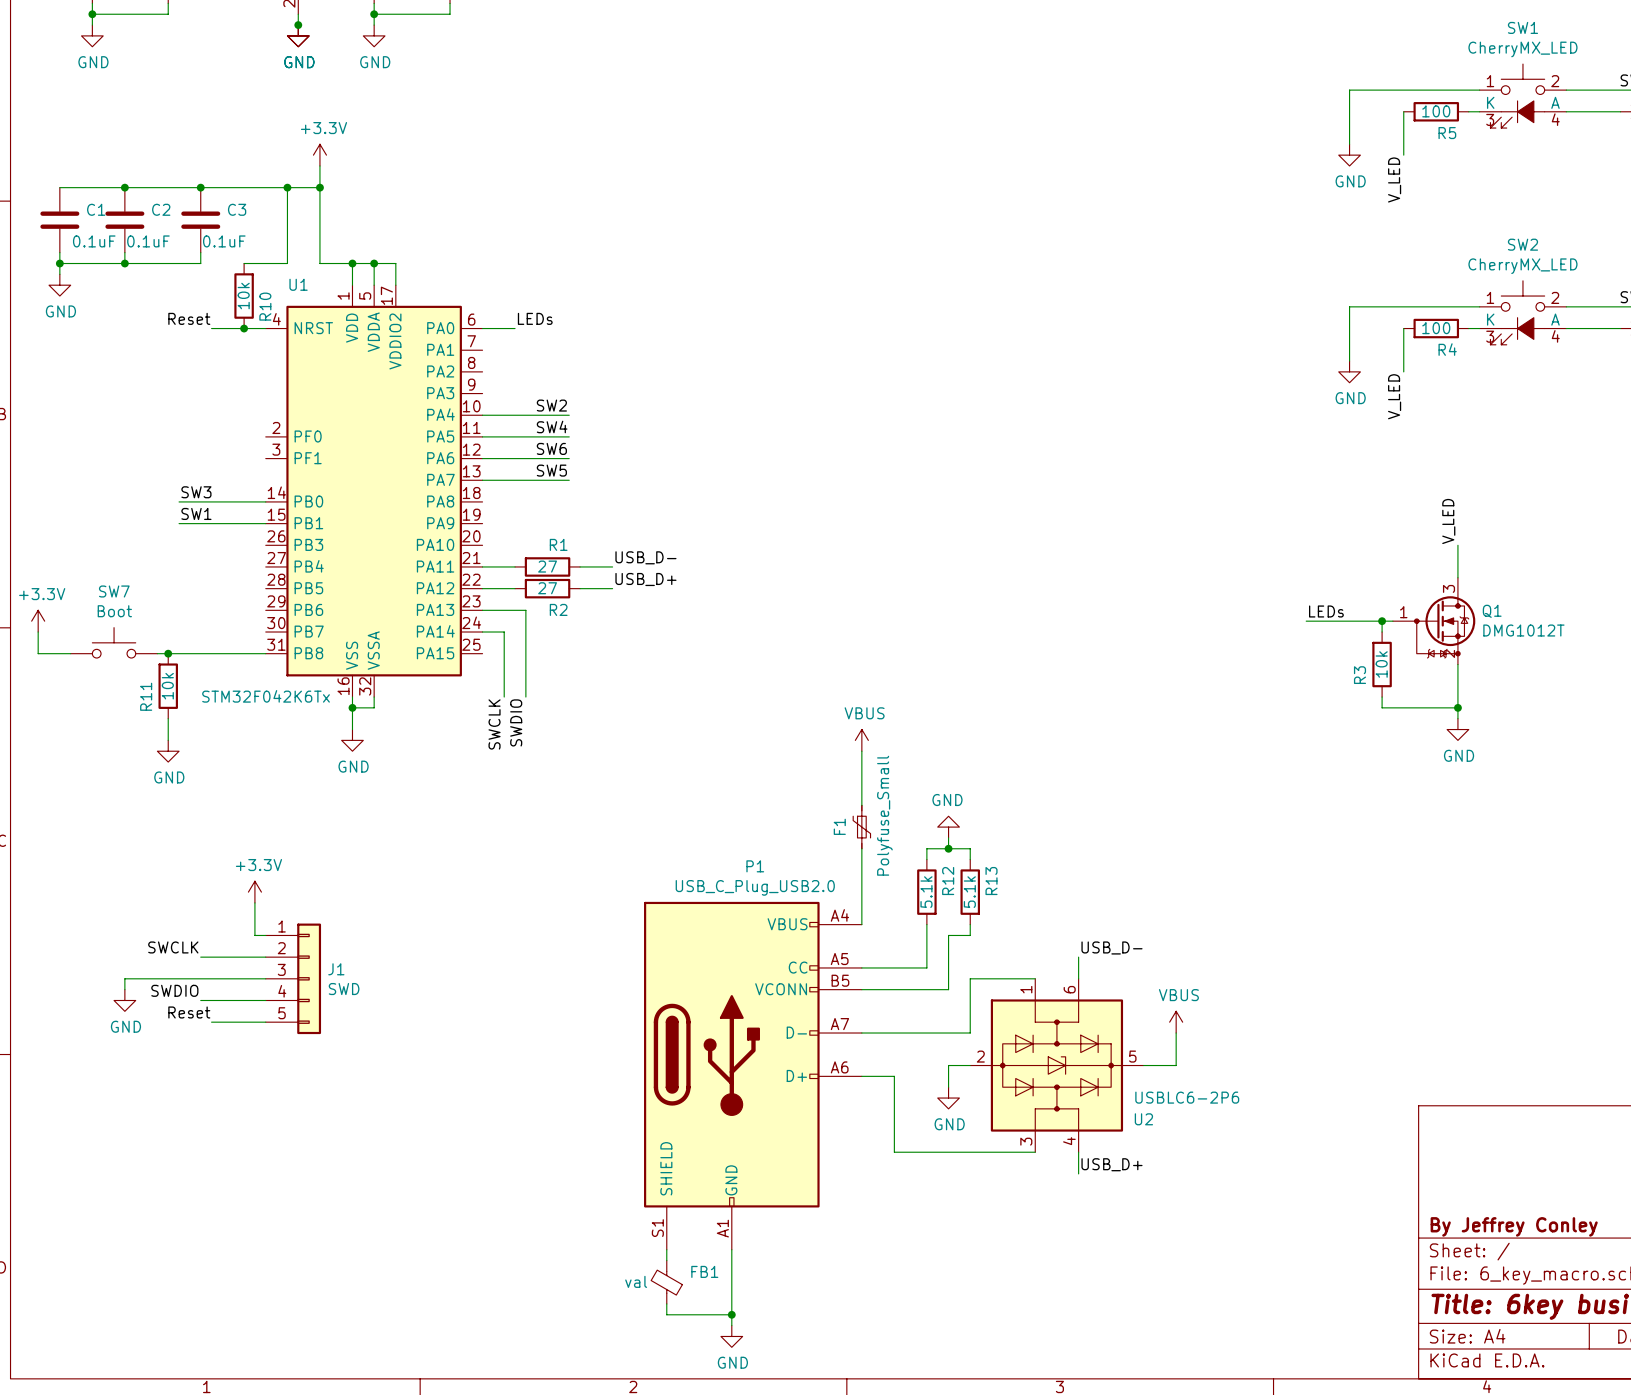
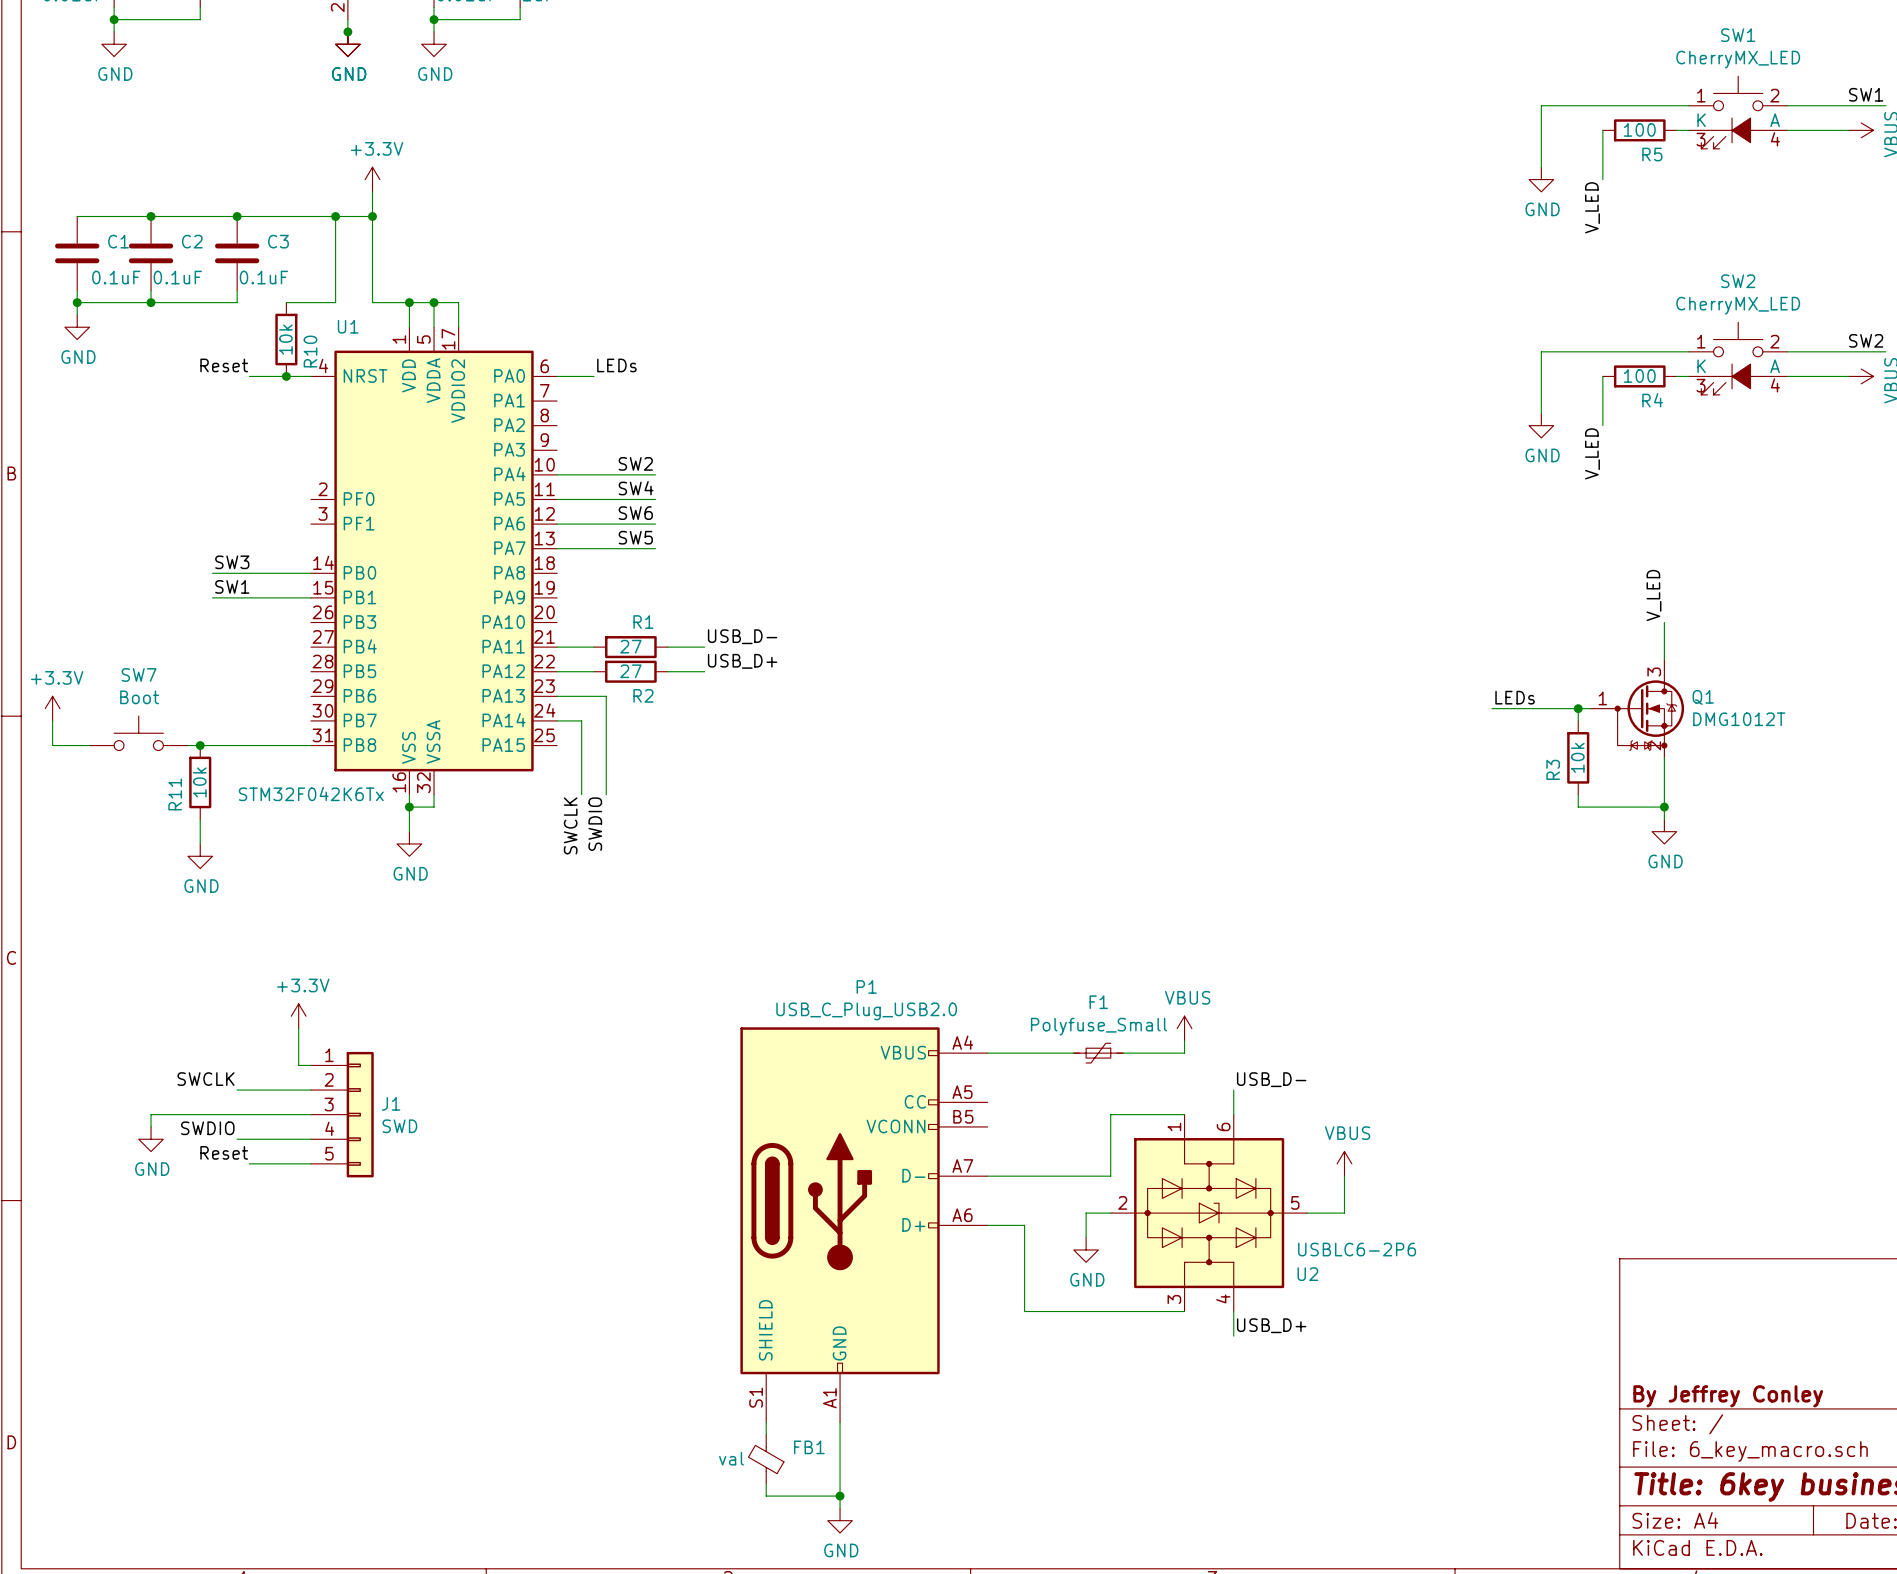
power symbol: VBUS (861, 740) -> none
wire: (861, 751) (861, 805) -> none
F1 value position: Polyfuse_Small (884, 815) -> Polyfuse_Small (1099, 1026)
F1 name position: F1 (839, 826) -> F1 (1098, 1002)
F1 rotation: 0° (861, 827) -> 90° clockwise (1098, 1053)
F1 position: (861, 827) -> (1098, 1053)
power symbol: GND (948, 827) -> none
wire: (948, 837) (948, 848) -> none
wire: (861, 848) (861, 924) -> (1073, 1053) (987, 1053)
junction: (948, 848) -> none
wire: (926, 859) (926, 848) (970, 848) (970, 859) -> none
R12: 5.1k (926, 892) -> none
R13: 5.1k (970, 892) -> none
power symbol: none -> VBUS (1184, 1028)
wire: none -> (1184, 1040) (1184, 1053) (1123, 1053)
wire: (926, 924) (926, 967) (861, 967) -> none
wire: (970, 924) (970, 935) (948, 935) (948, 989) (861, 989) -> none

